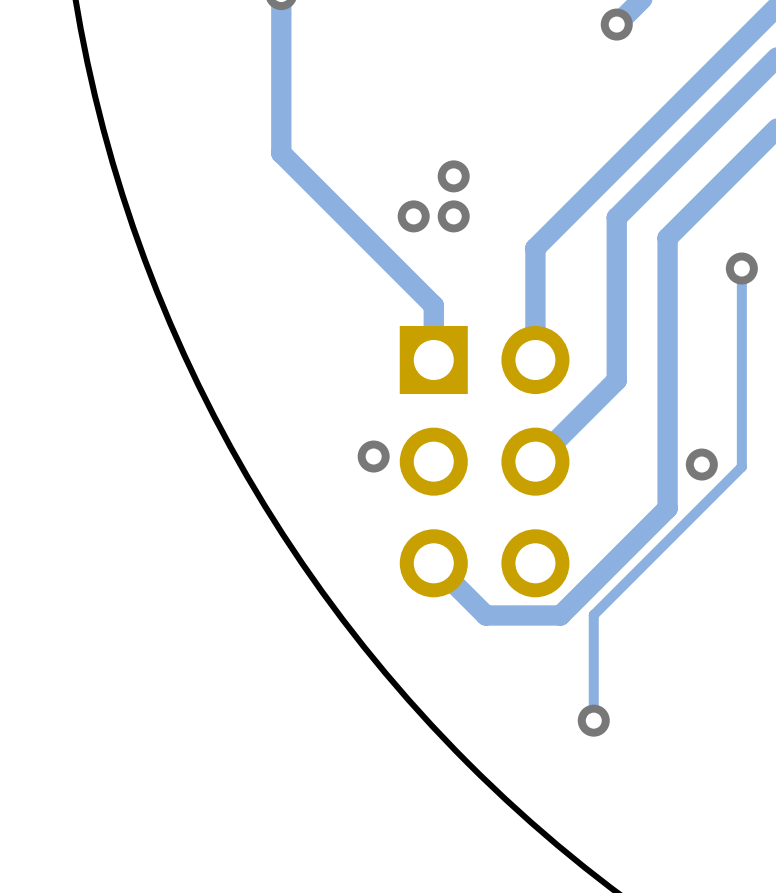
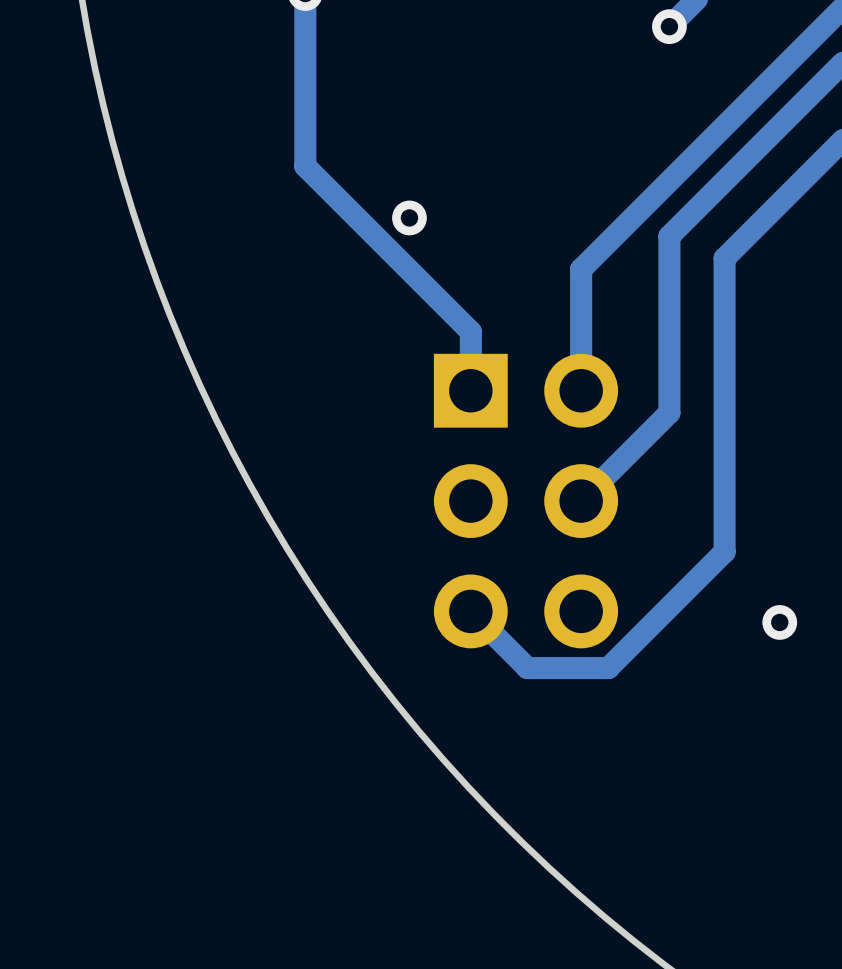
via: (453, 176) -> none
via: none -> (409, 217)
via: (413, 216) -> none
via: (453, 216) -> none
track: (741, 268) (741, 466) (593, 615) (593, 720) -> none
via: (741, 268) -> none
via: (373, 456) -> none
via: (701, 464) -> none
via: none -> (779, 622)
via: (593, 720) -> none

